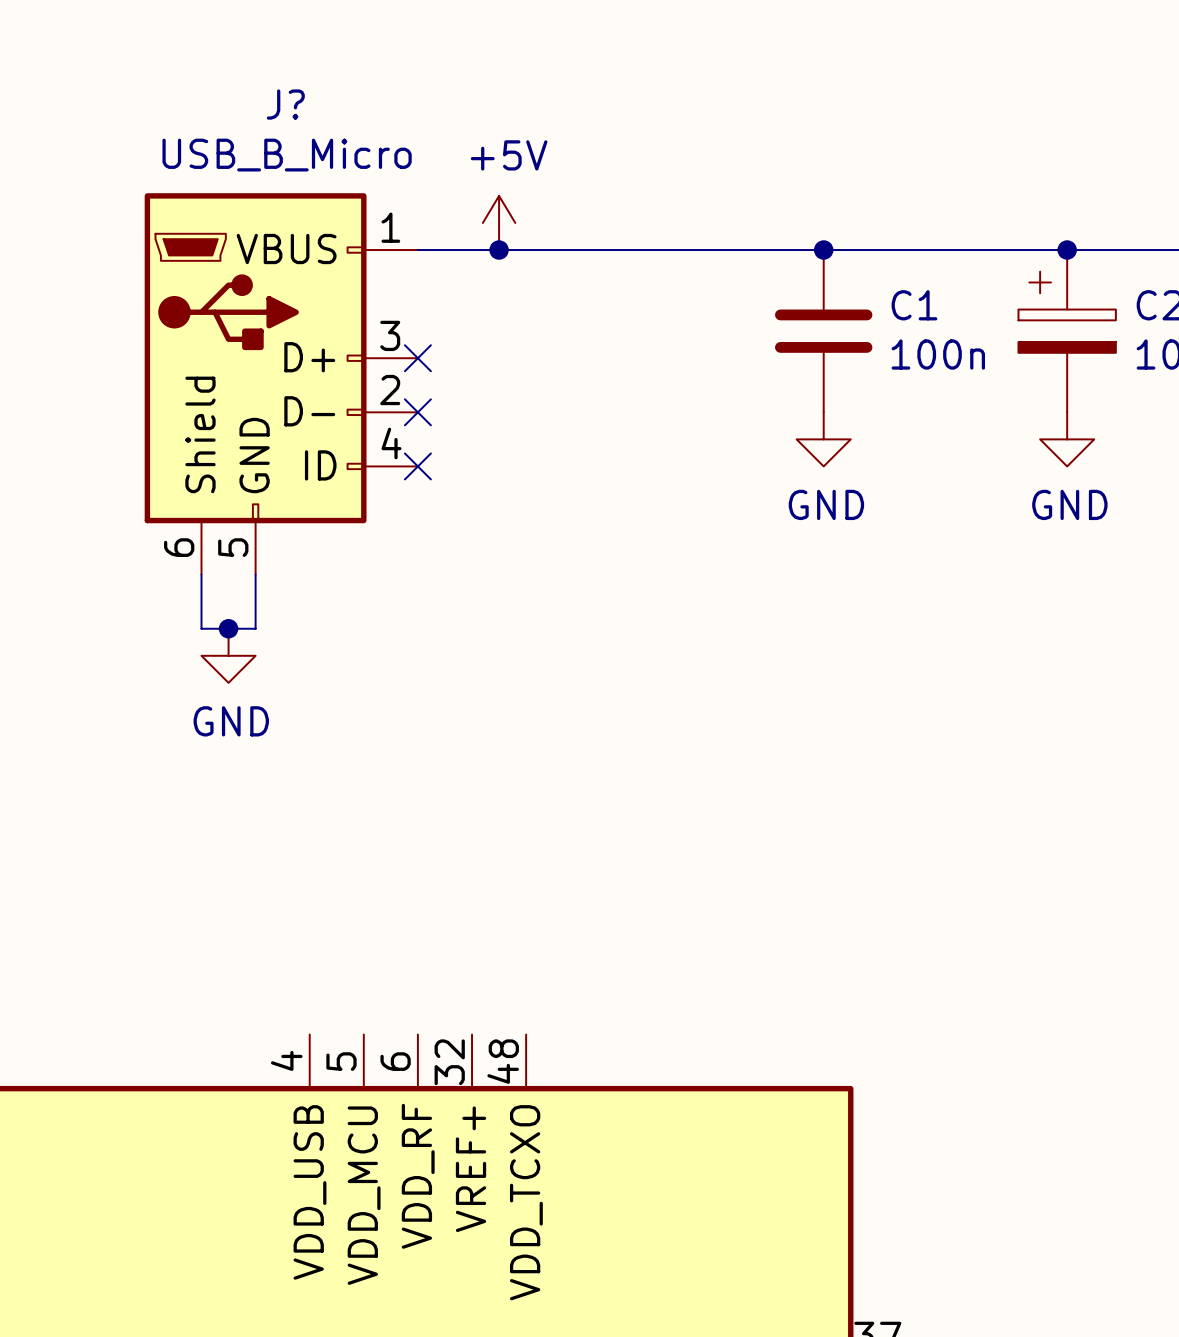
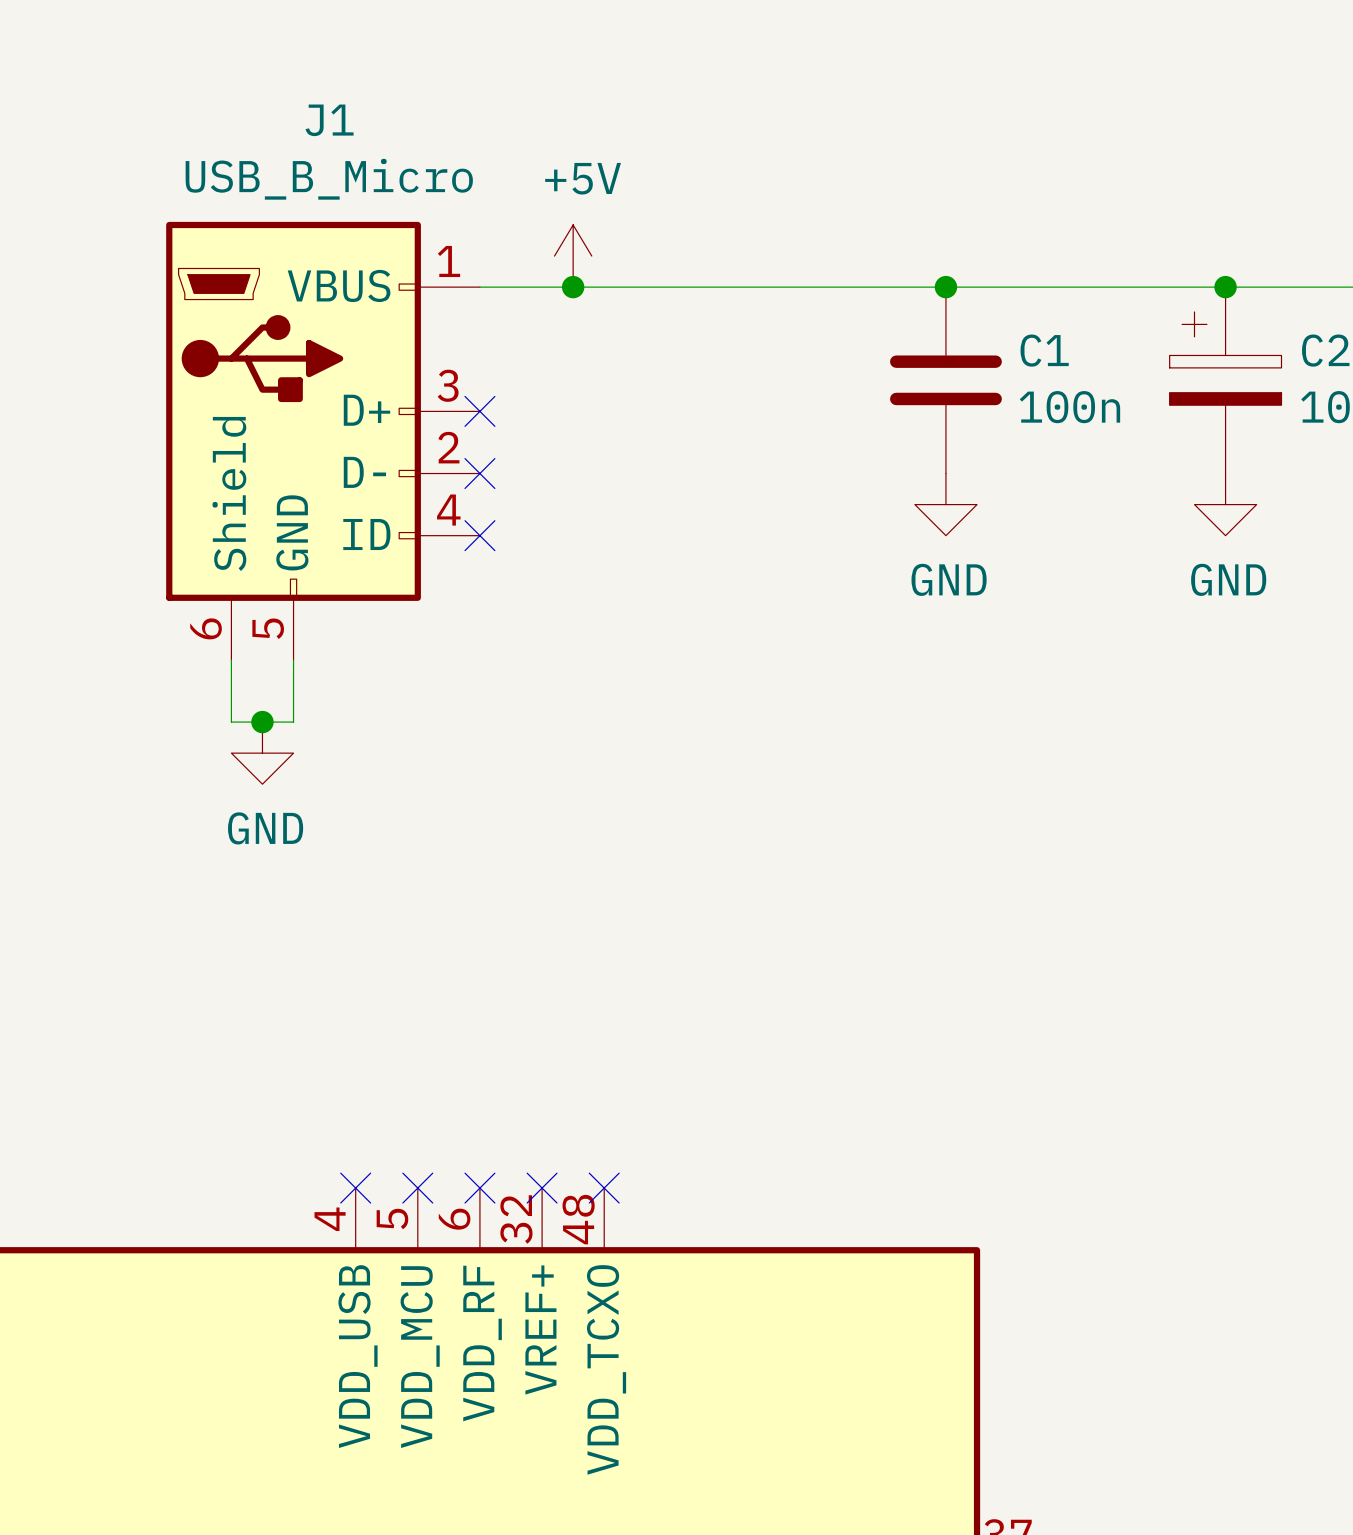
J? name: J? (285, 104) -> J1 (329, 120)
no-connect mark: none -> (355, 1188)
no-connect mark: none -> (417, 1188)
no-connect mark: none -> (479, 1188)
no-connect mark: none -> (542, 1188)
no-connect mark: none -> (604, 1188)

